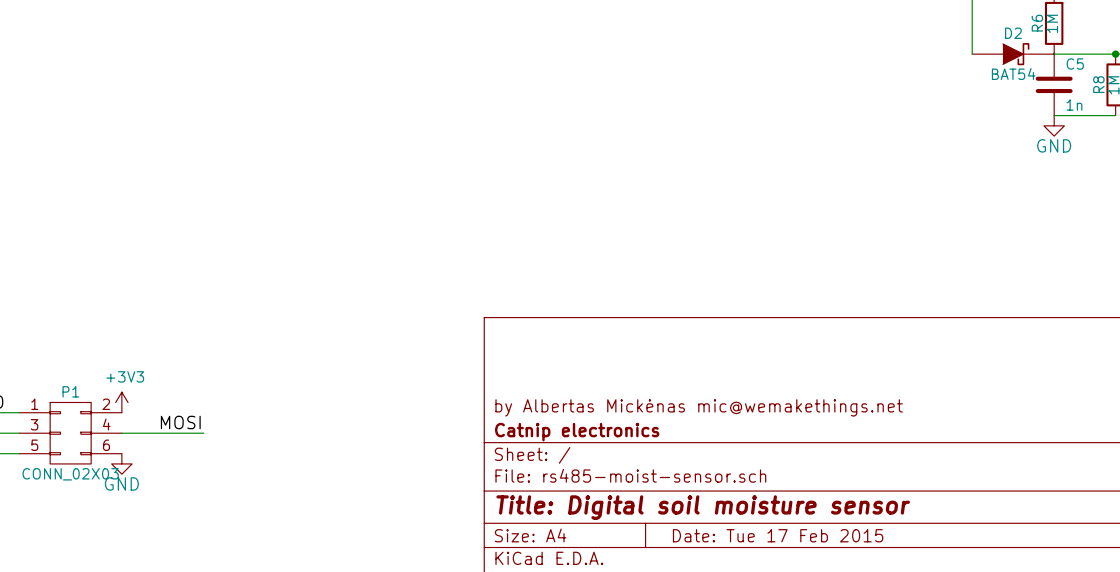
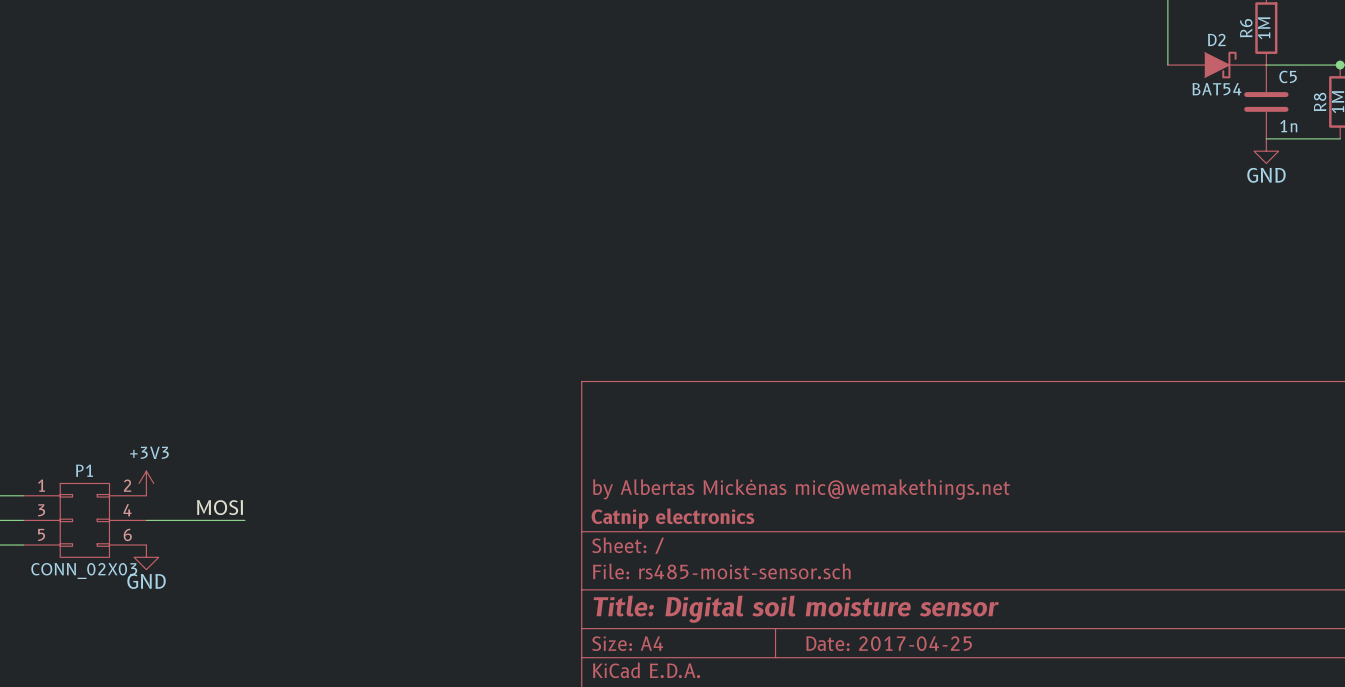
title block: Date: Tue 17 Feb 2015 (778, 535) -> Date: 2017-04-25 (889, 643)

